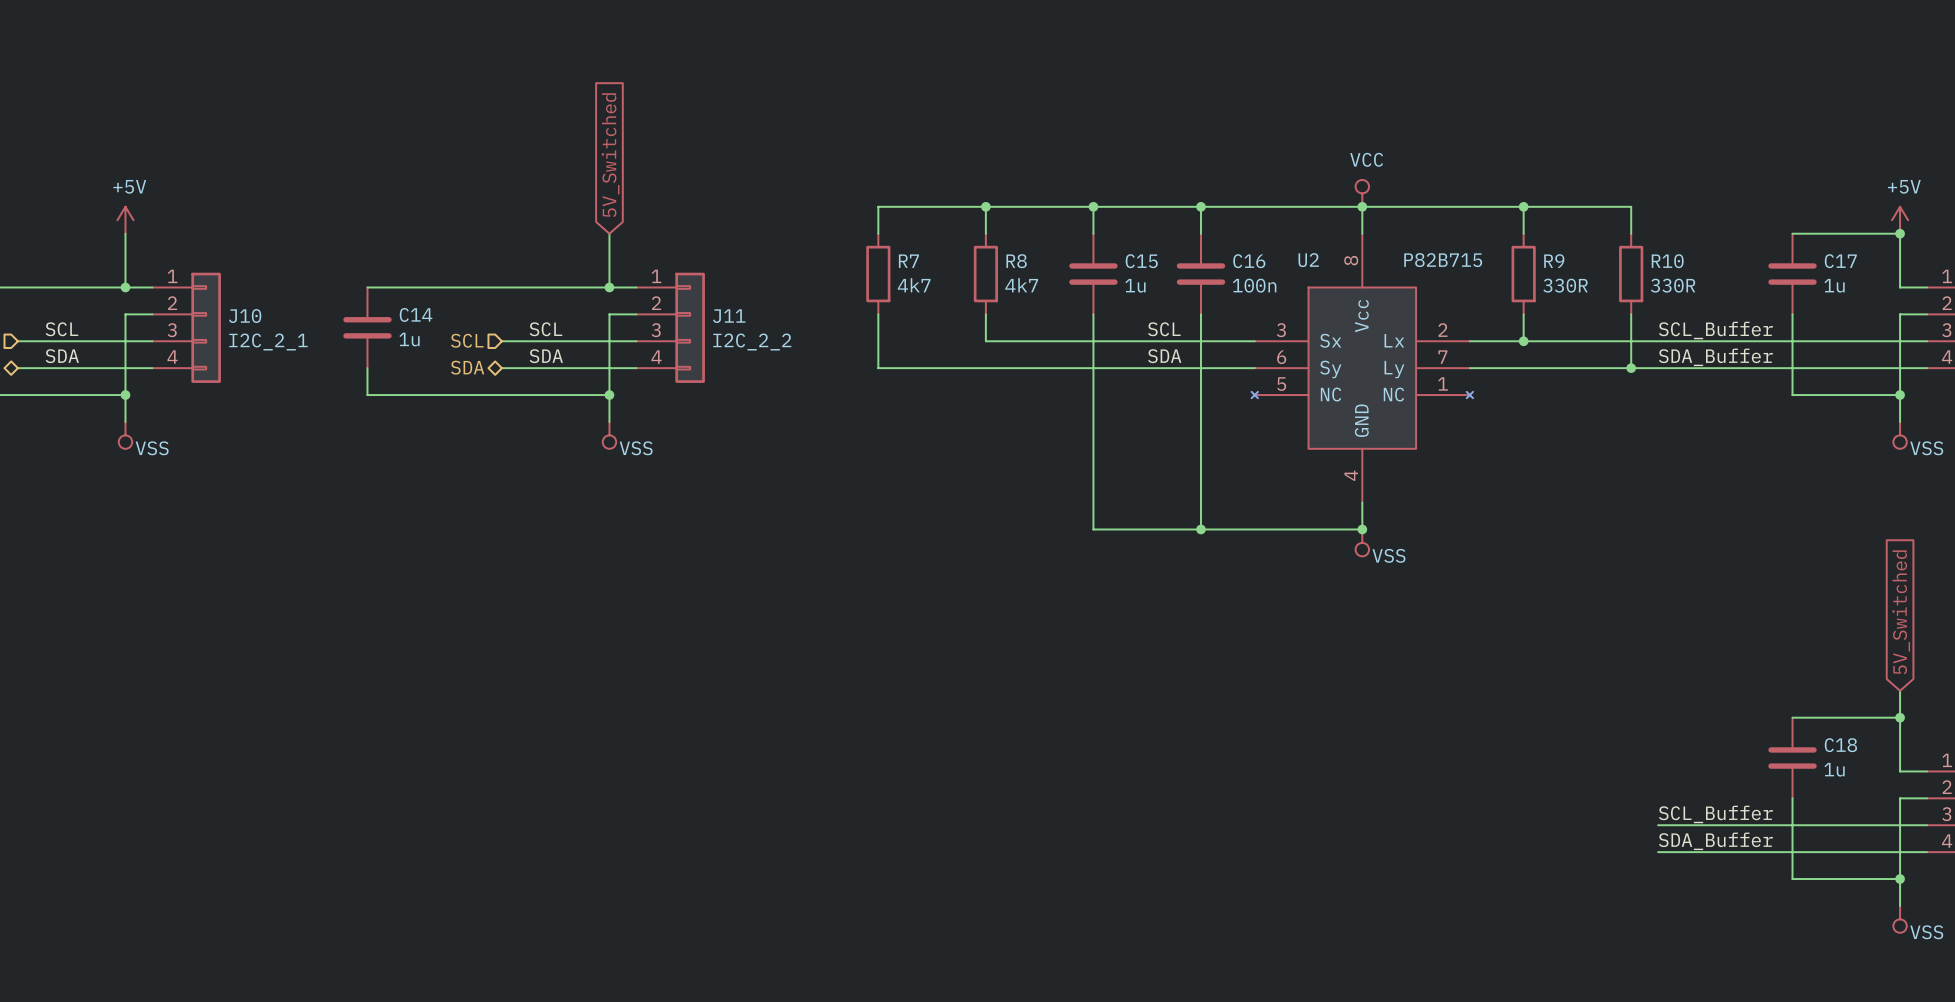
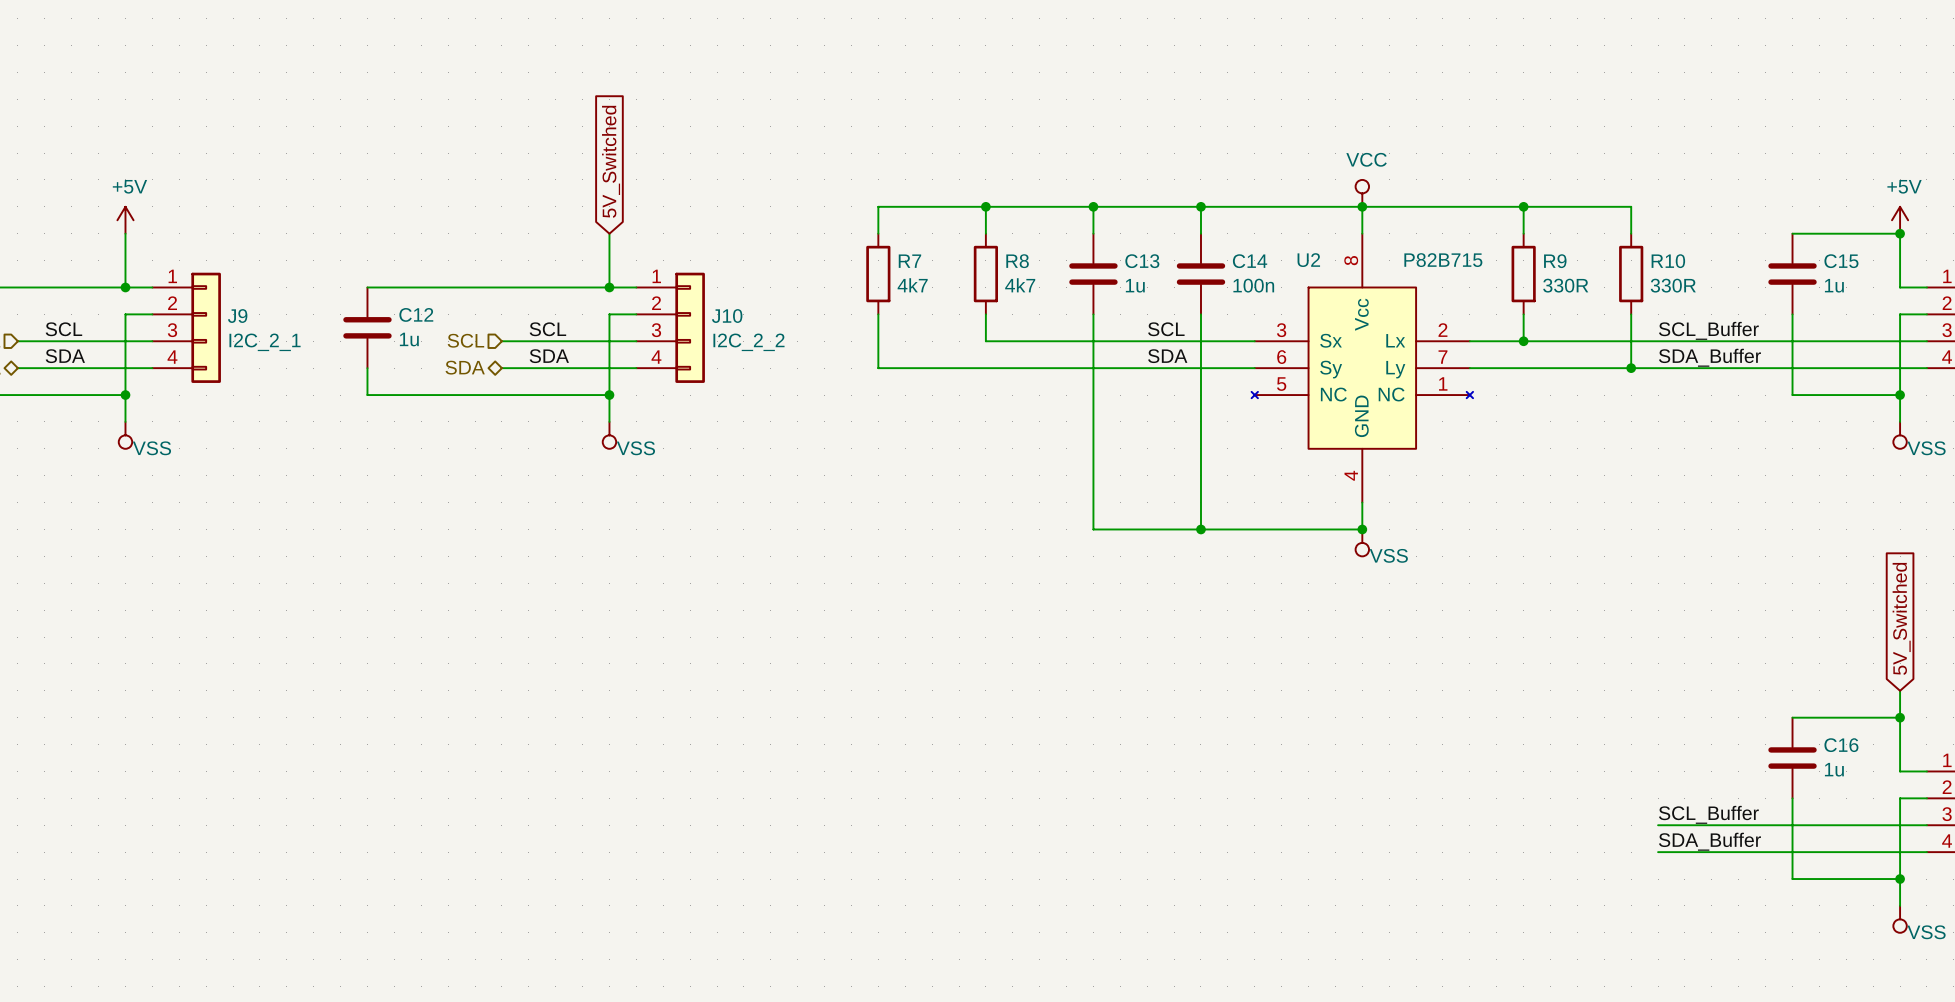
C15 name: C15 (1141, 261) -> C13 (1142, 261)
C16 name: C16 (1249, 261) -> C14 (1250, 261)
C17 name: C17 (1840, 261) -> C15 (1841, 261)
C14 name: C14 (416, 314) -> C12 (416, 314)
J10 name: J10 (245, 316) -> J9 (237, 316)
J11 name: J11 (729, 316) -> J10 (727, 316)
C18 name: C18 (1840, 745) -> C16 (1841, 745)

